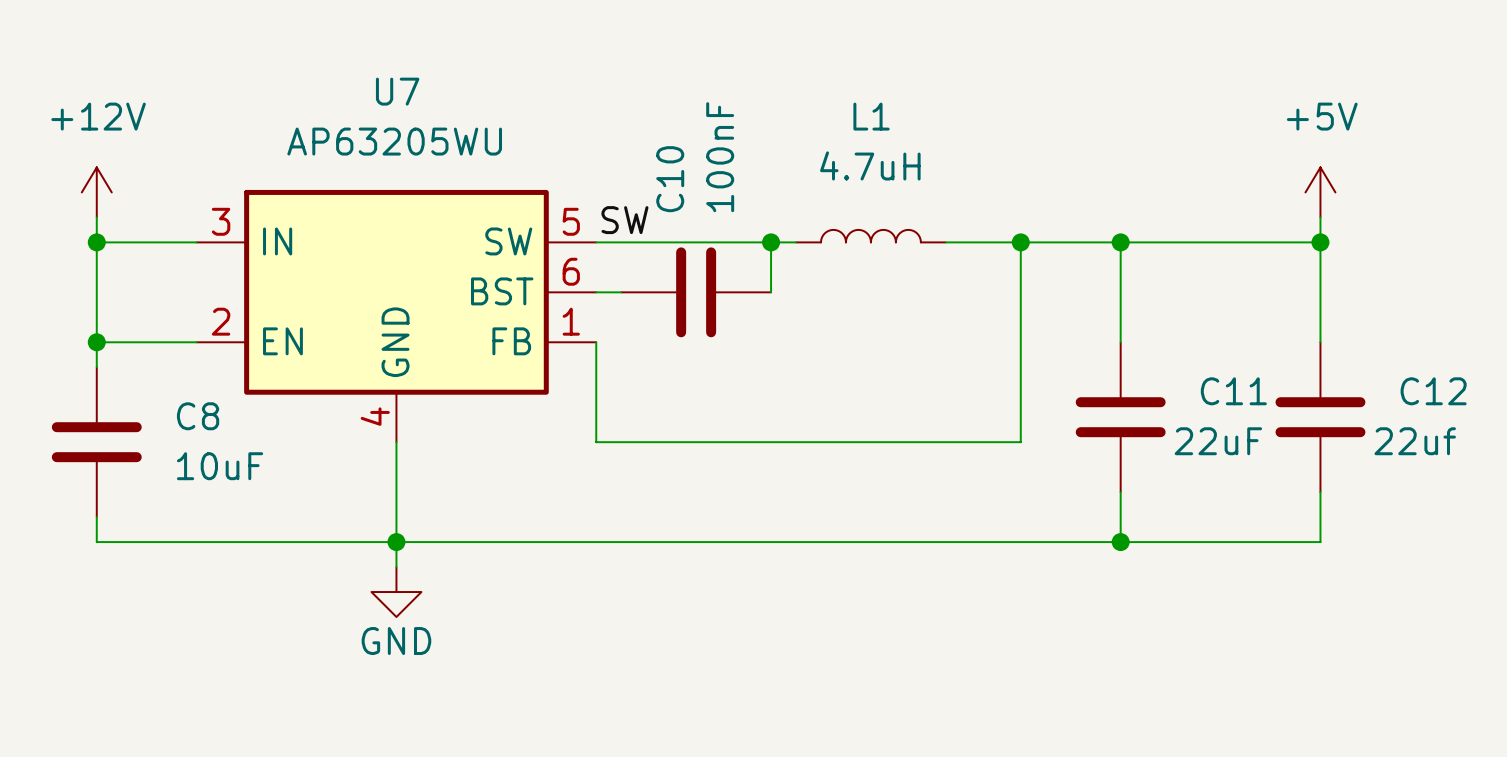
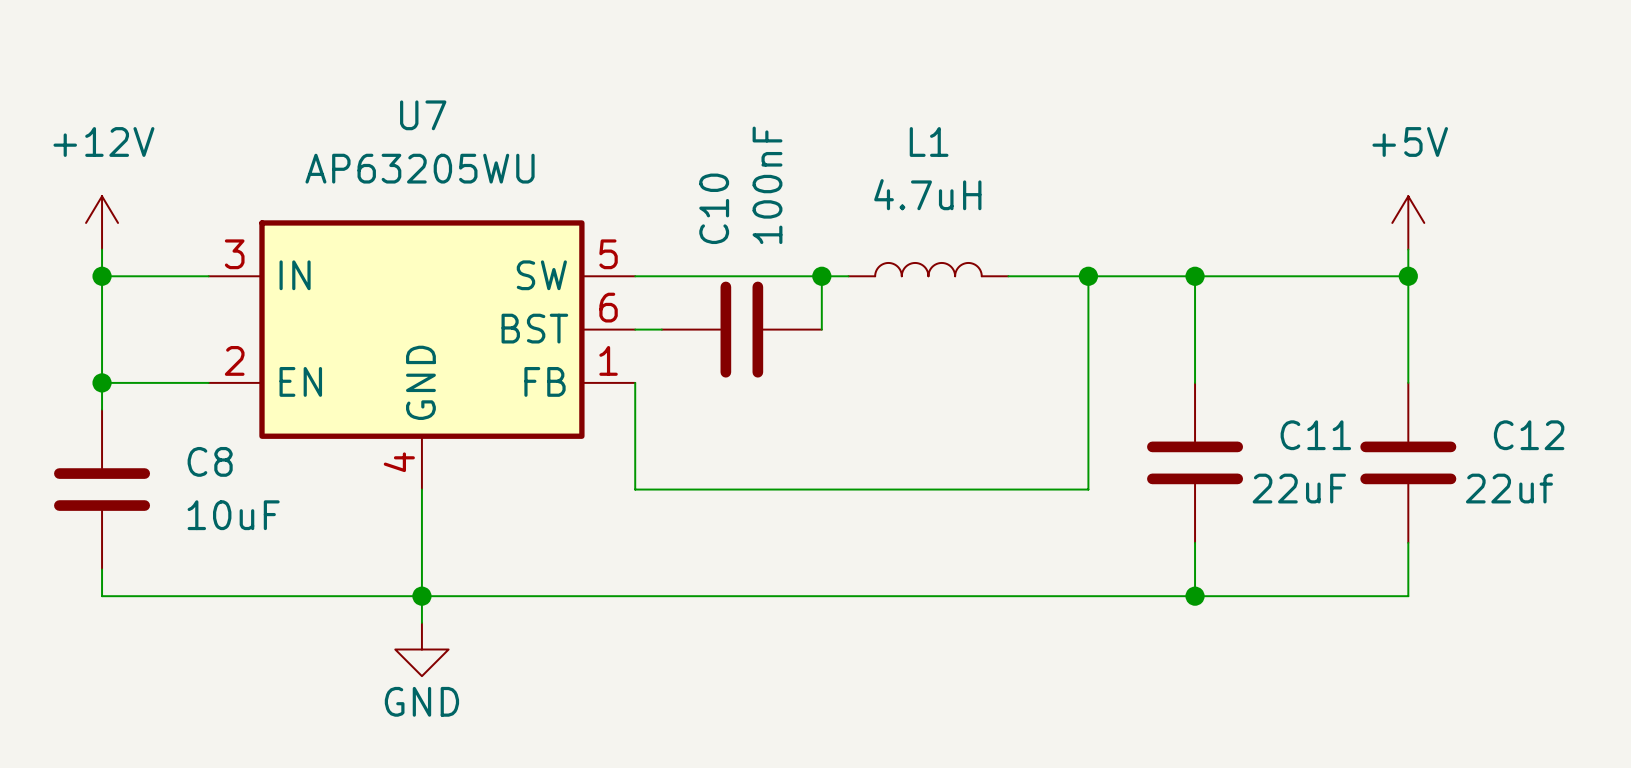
label: SW (624, 220) -> none

